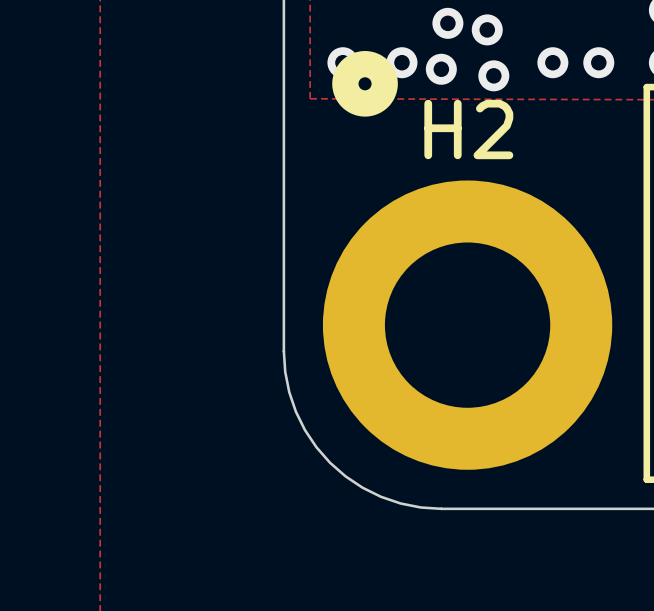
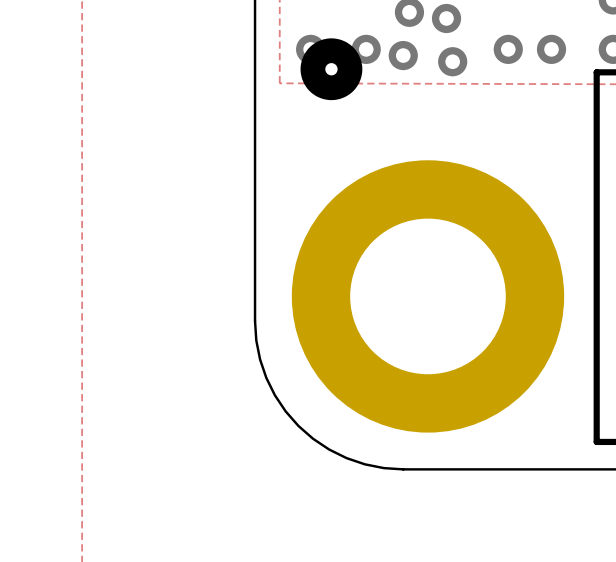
H2 name: H2 (468, 129) -> none

